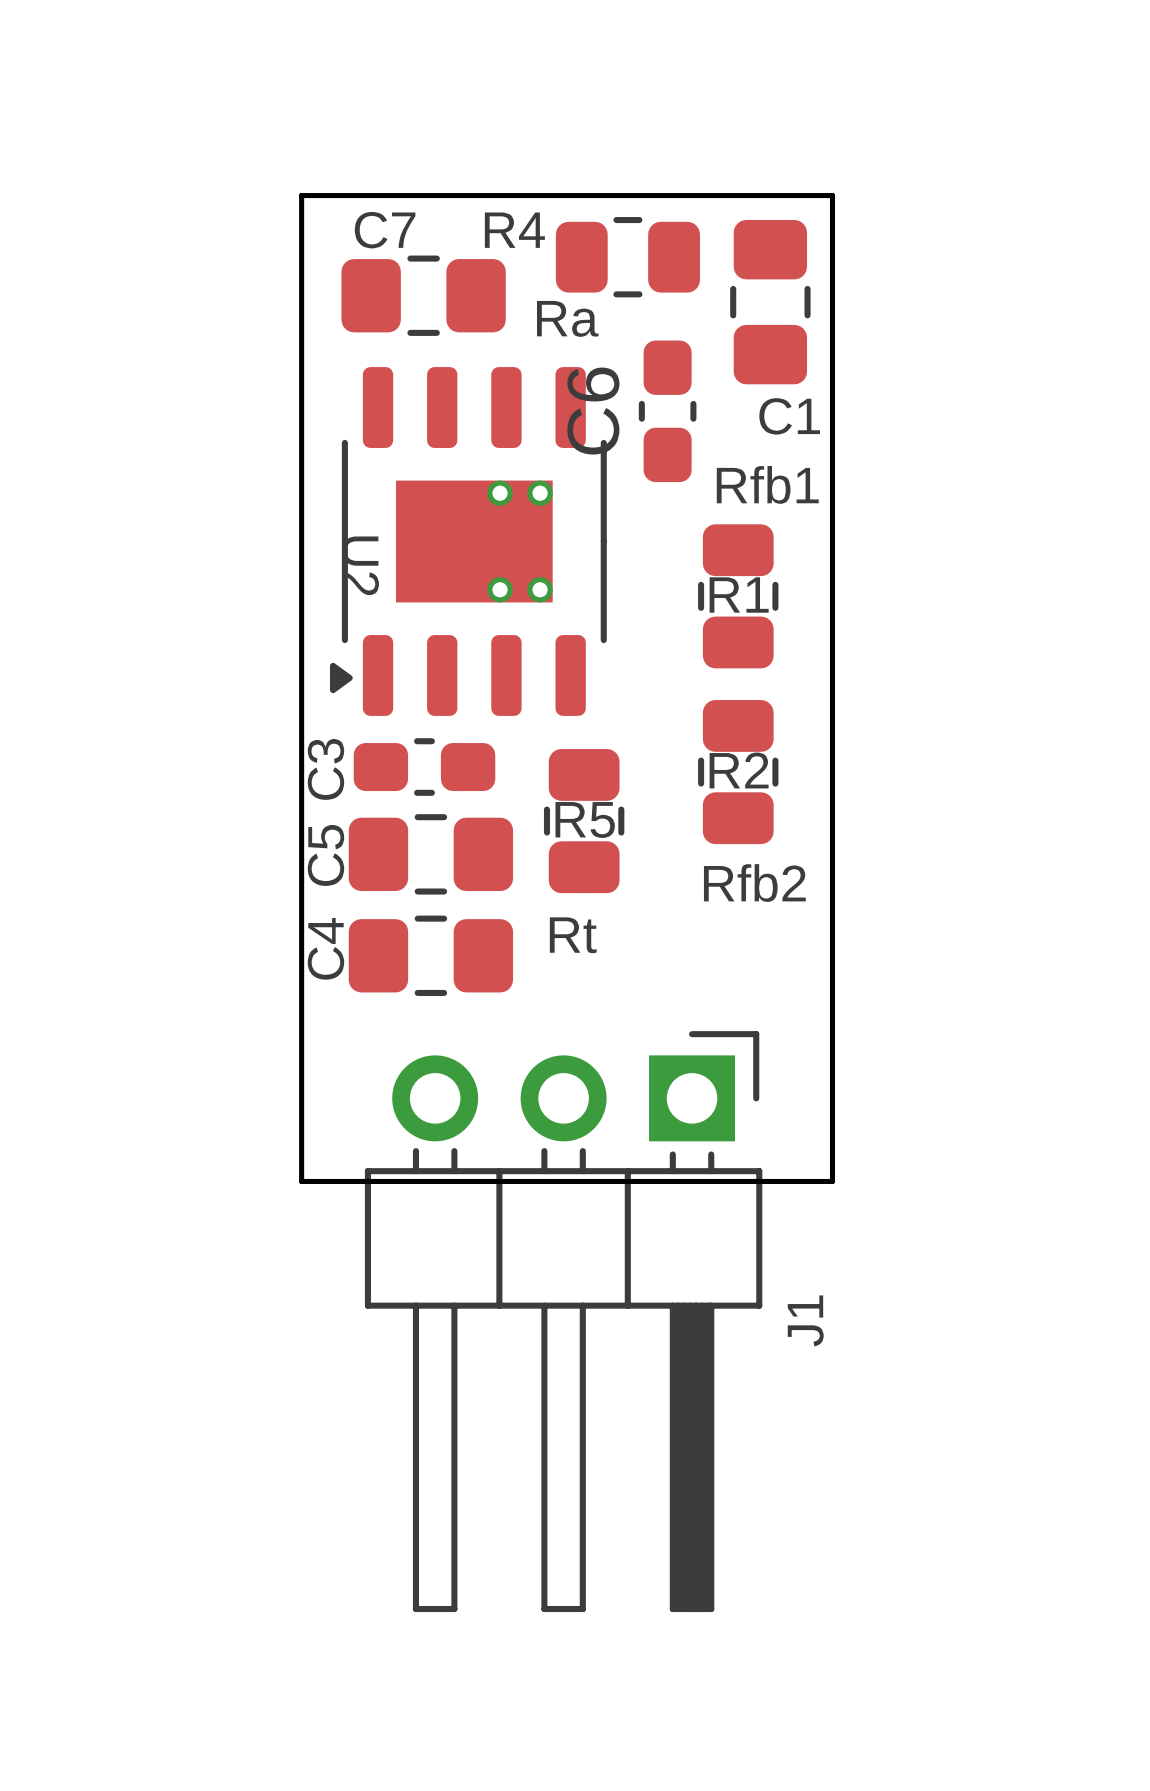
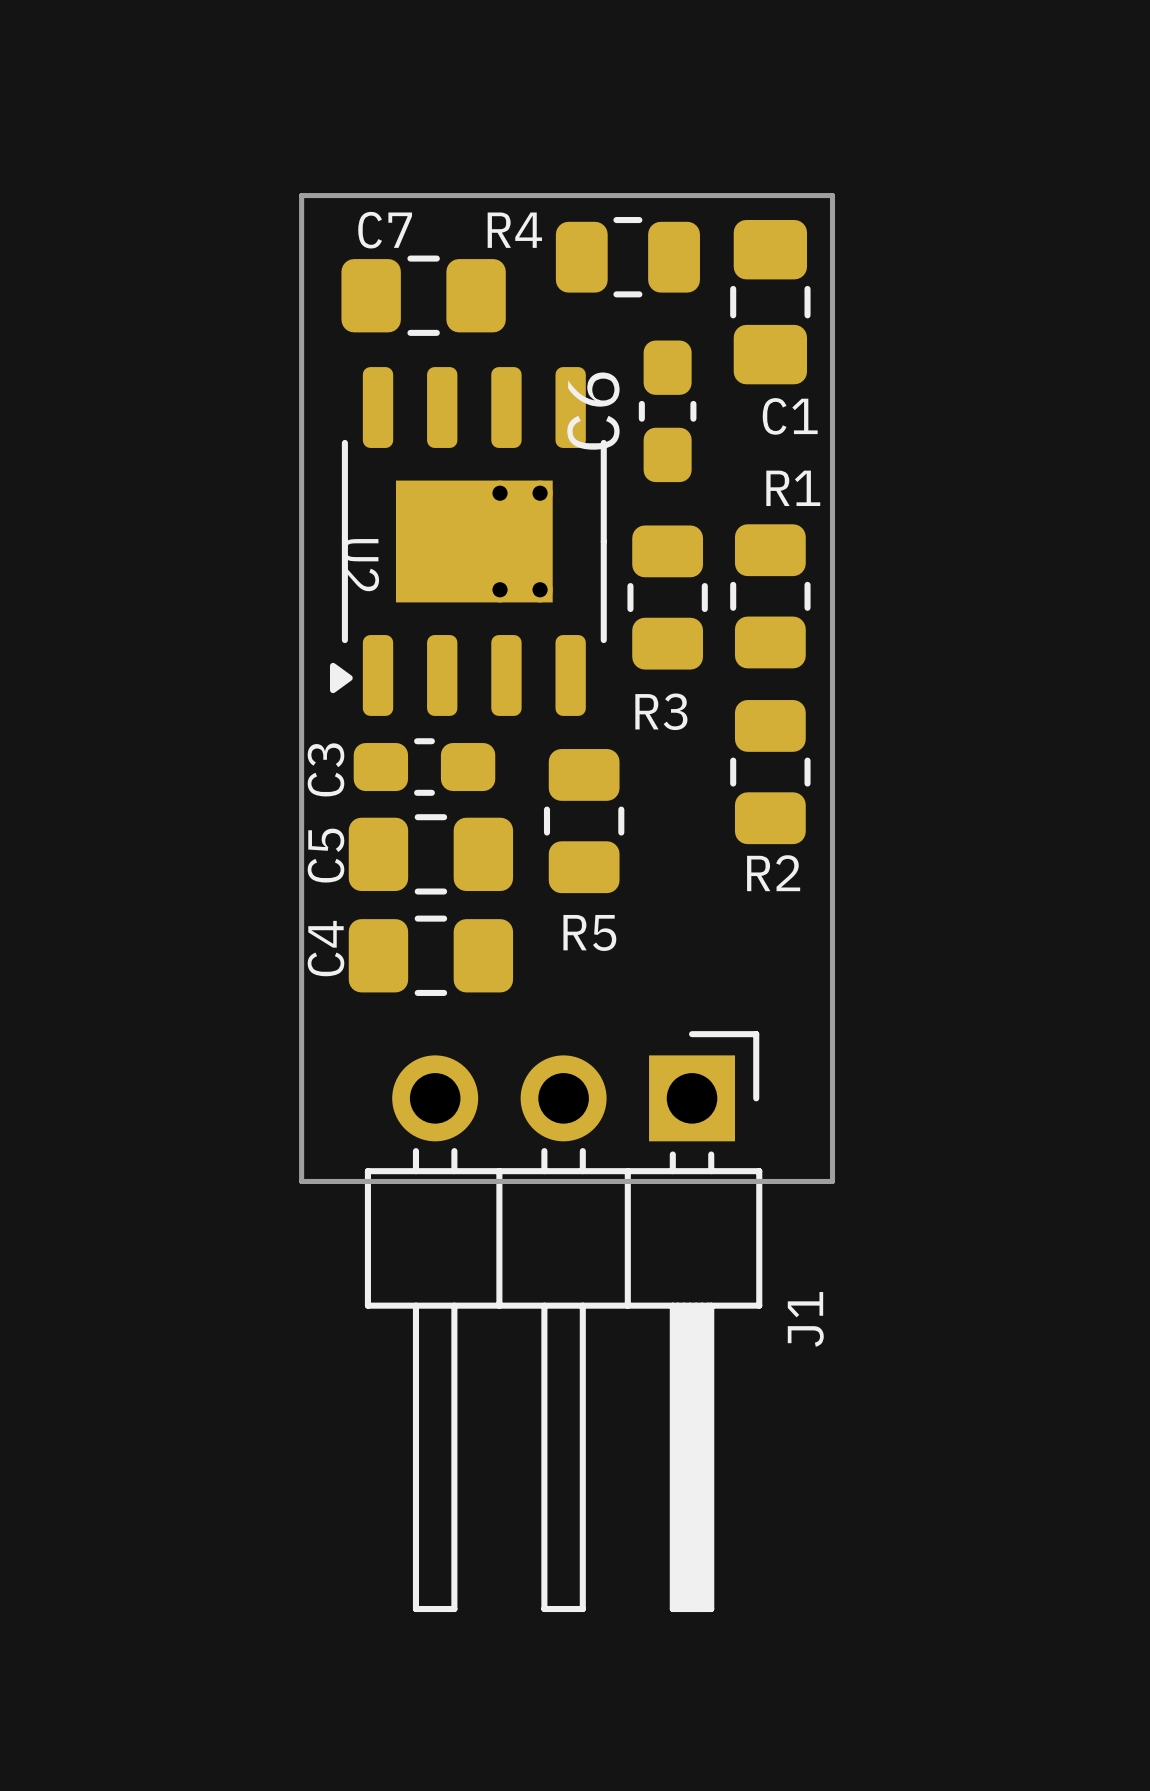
text: Ra (567, 318) -> none
text: Rfb1 (767, 484) -> none
R1 name position: R1 (739, 595) -> R1 (793, 488)
R1 position: (738, 596) -> (770, 596)
R3: none -> (667, 597)
R2 name position: R2 (739, 770) -> R2 (773, 873)
R2 position: (738, 772) -> (770, 772)
R5 name position: R5 (585, 820) -> R5 (589, 932)
text: Rfb2 (754, 883) -> none
text: Rt (573, 935) -> none

